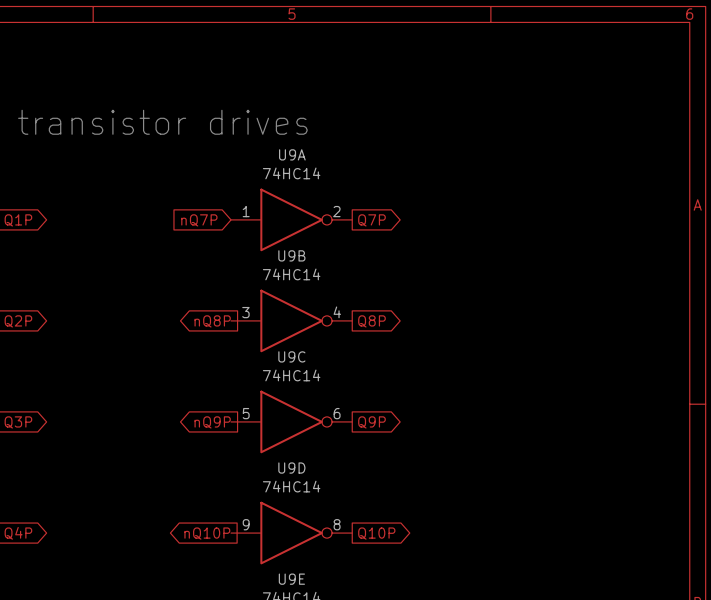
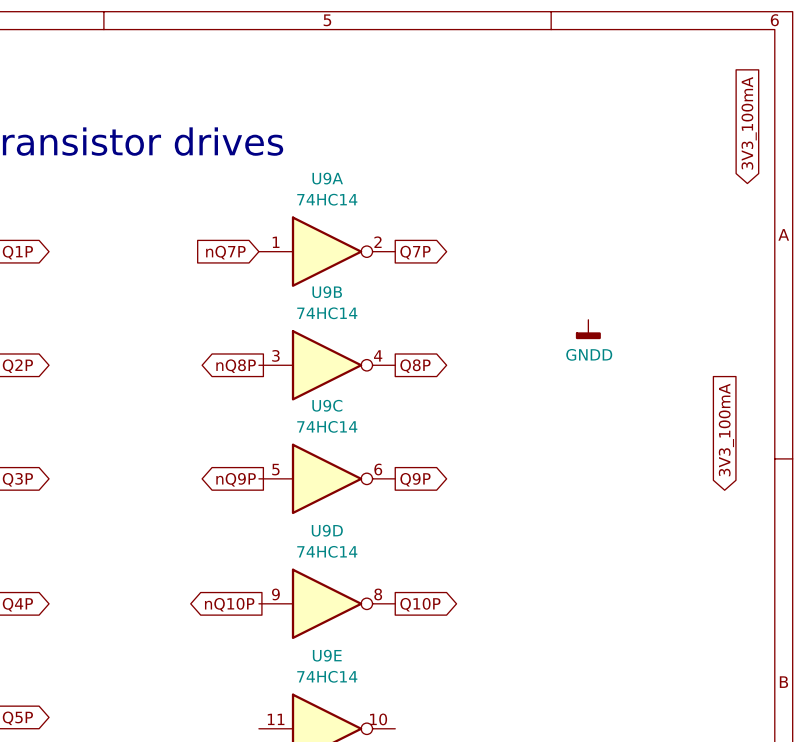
global label: none -> 3V3_100mA (749, 123)
power symbol: none -> GNDD (588, 329)
global label: none -> 3V3_100mA (726, 429)

